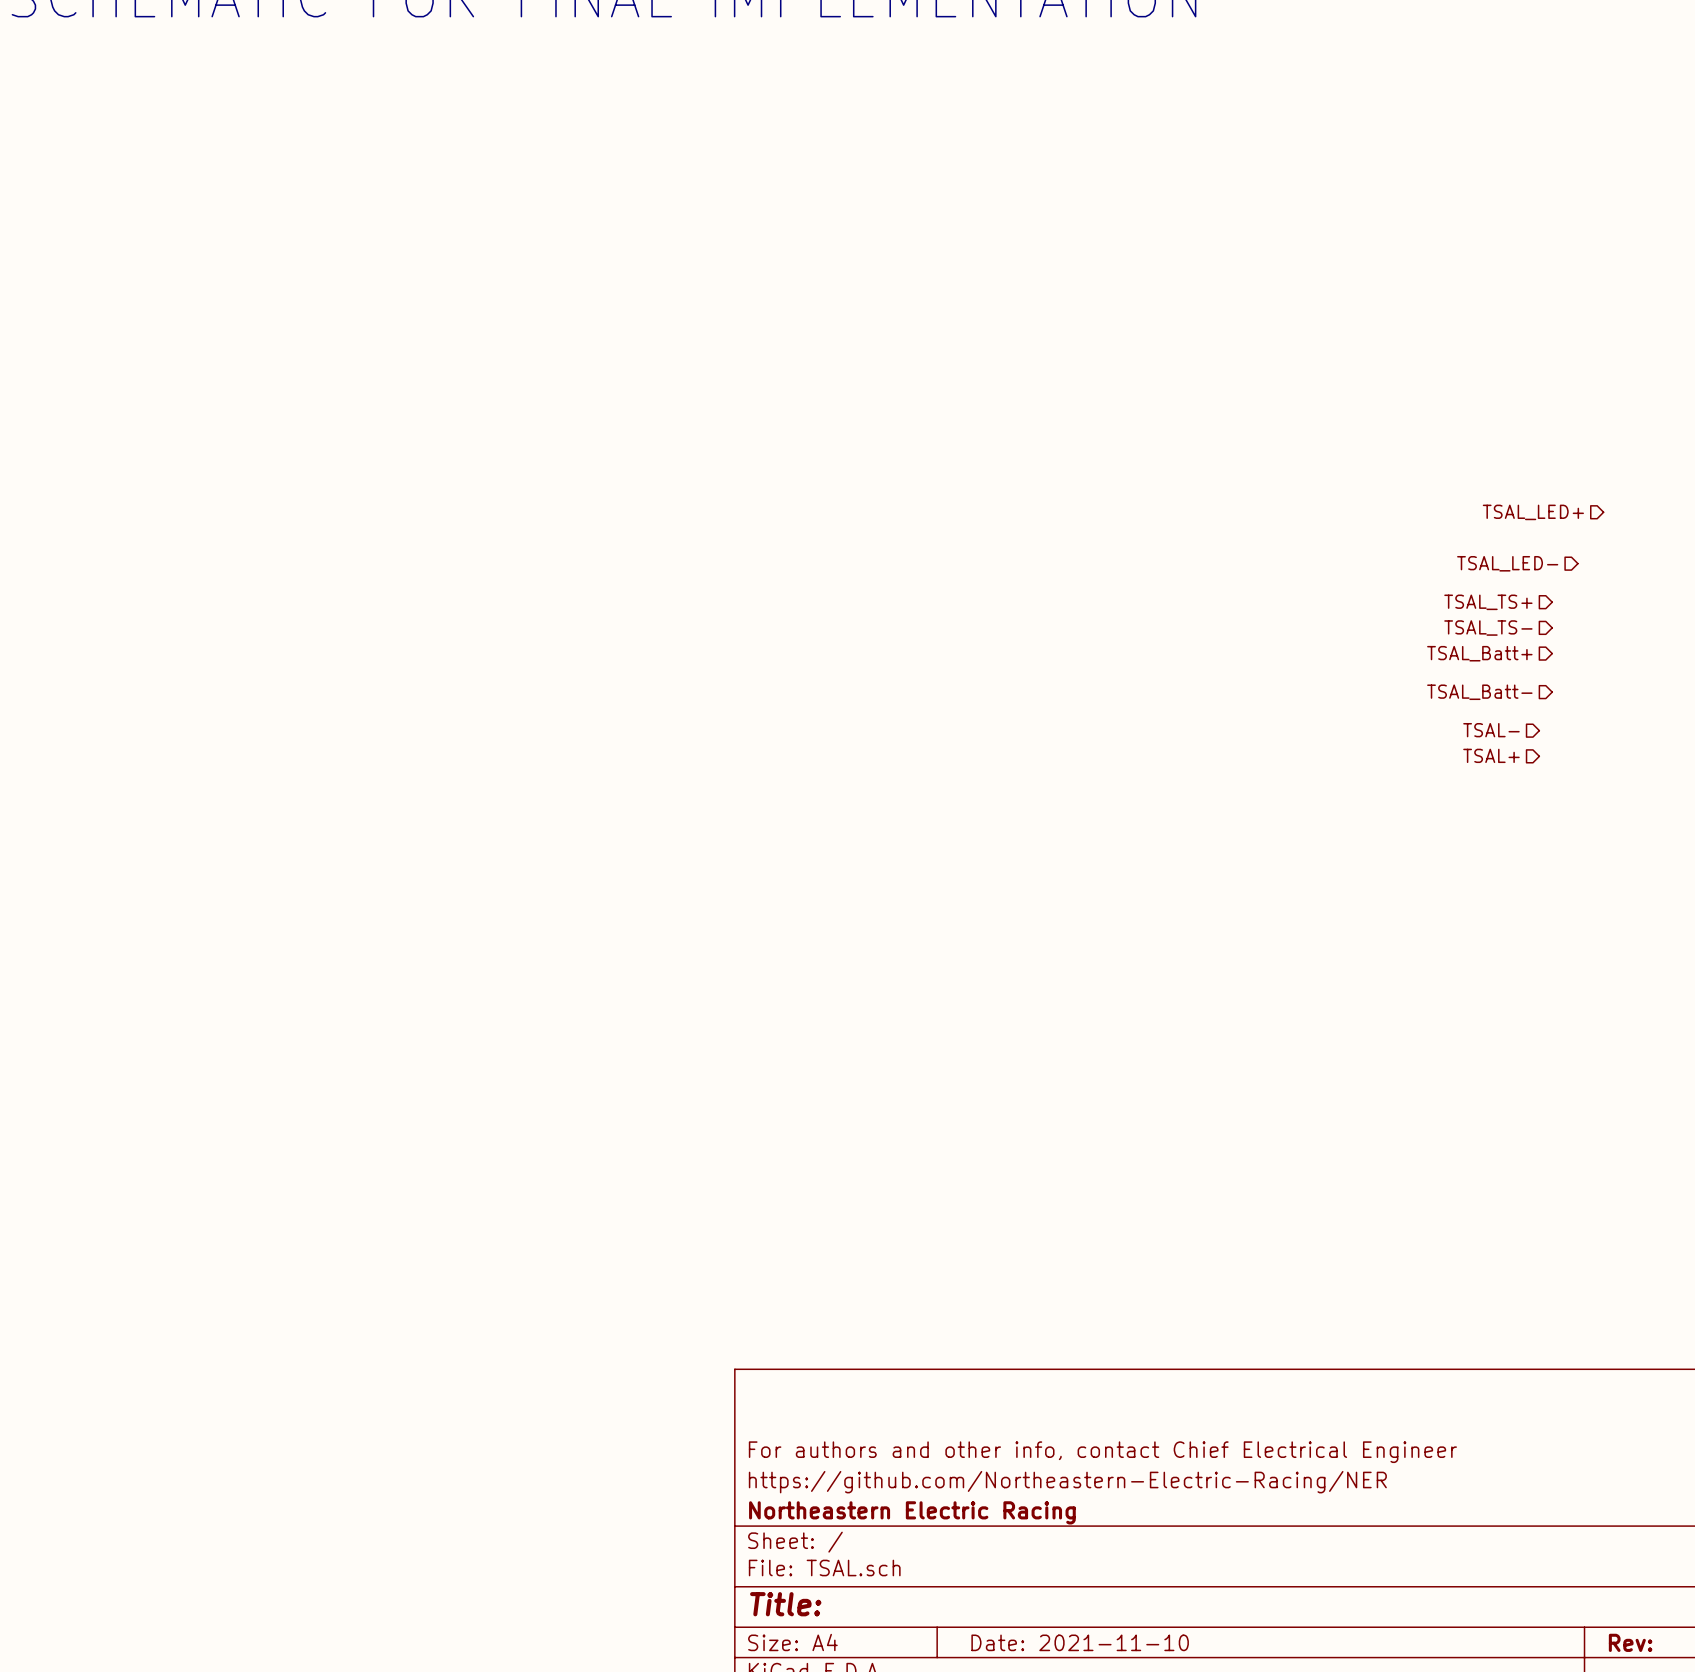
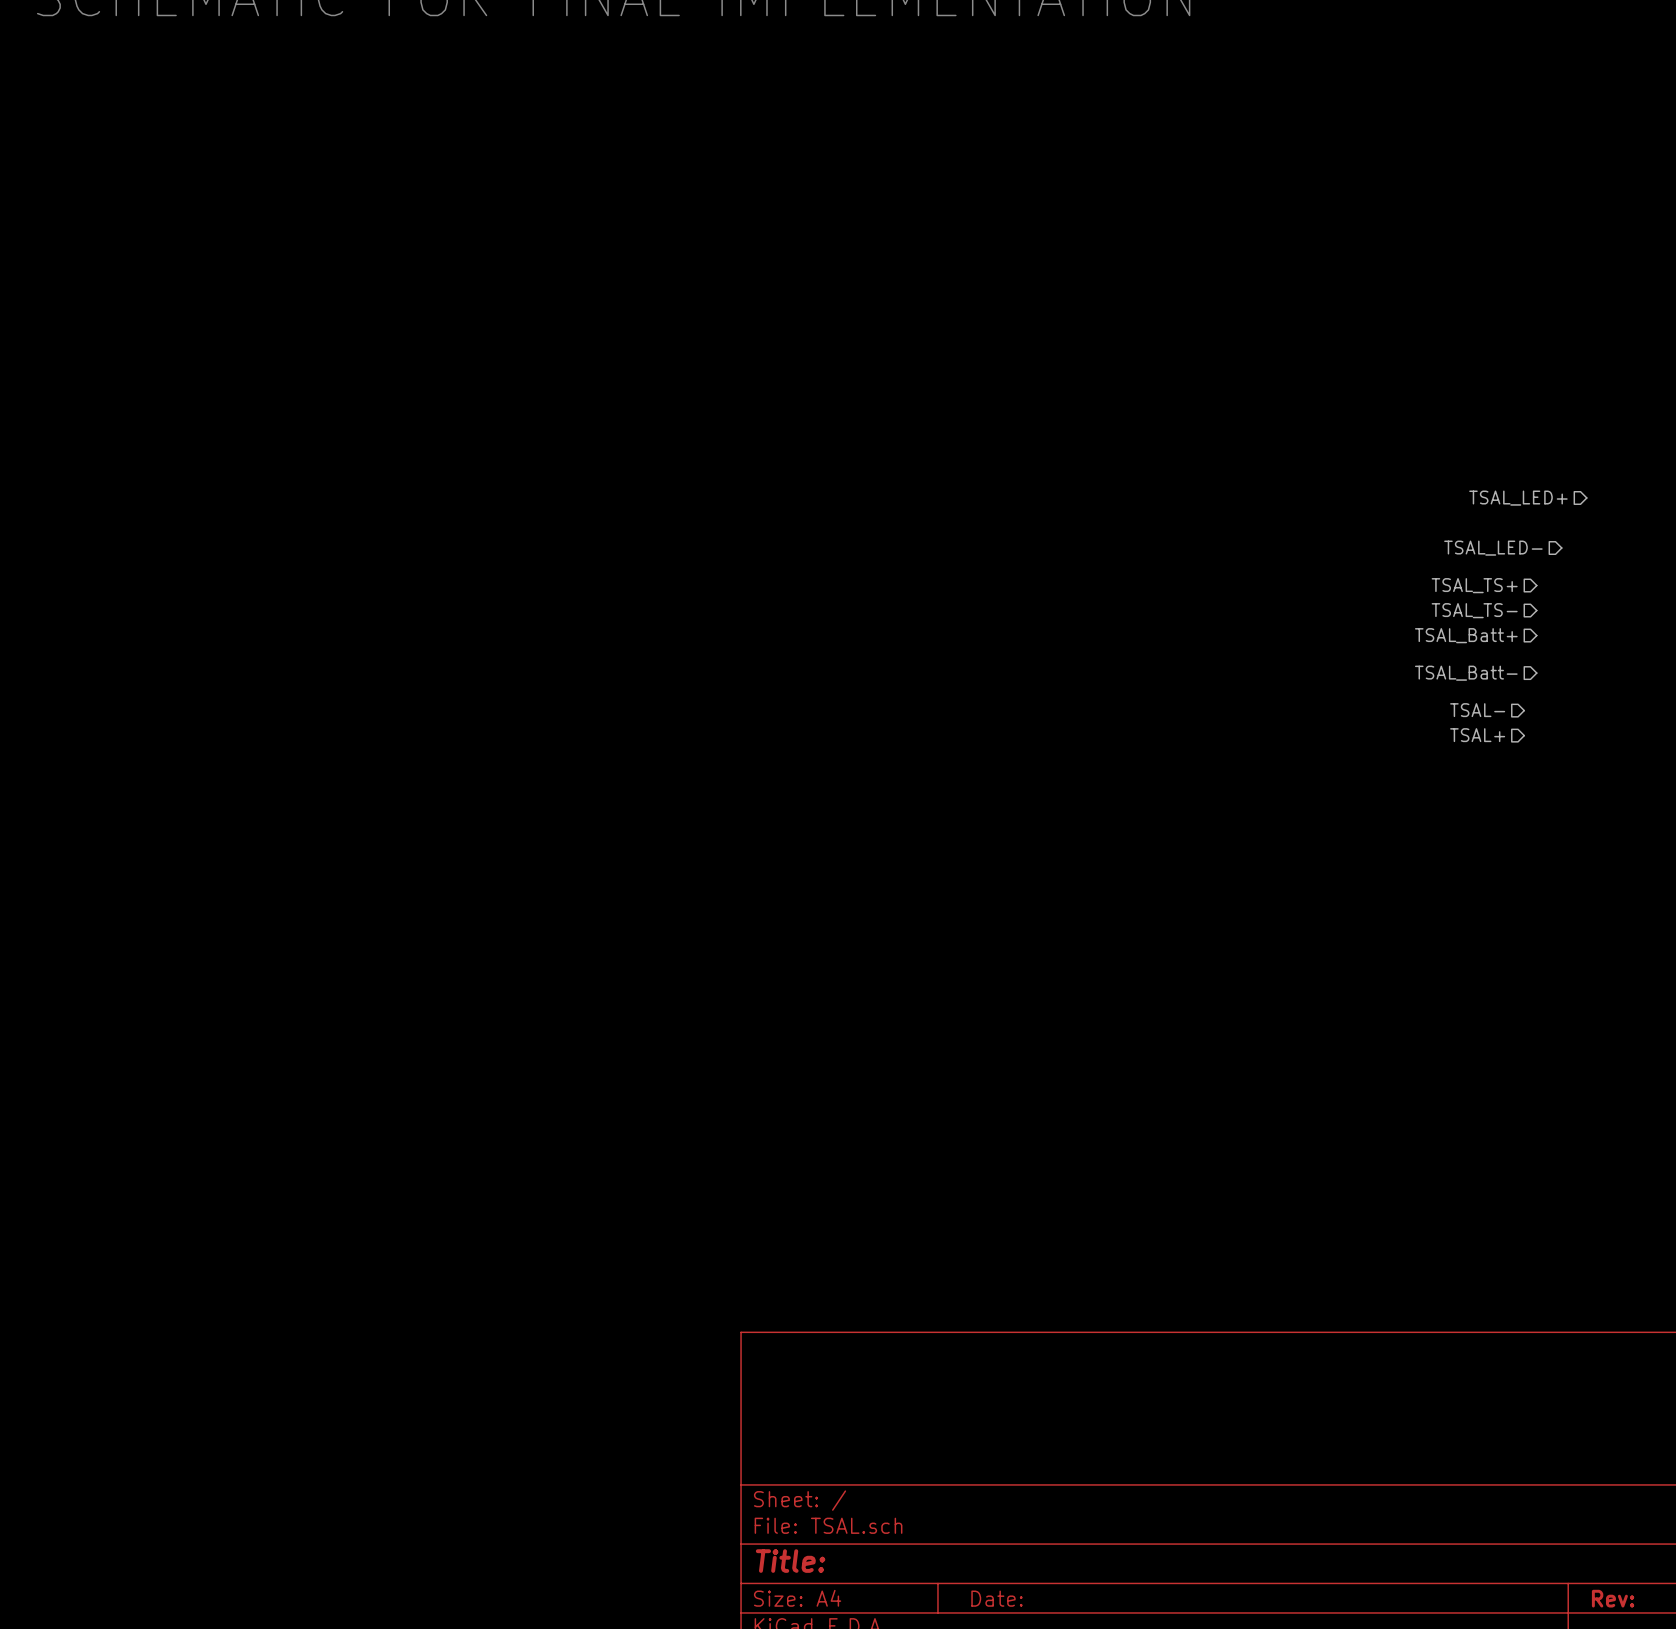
title block: For authors and other info, contact Chief Electrical Engineer (1102, 1452) -> none
title block: https://github.com/Northeastern-Electric-Racing/NER (1067, 1482) -> none
title block: Northeastern Electric Racing (912, 1512) -> none
title block: Date: 2021-11-10 (1080, 1642) -> Date: (997, 1598)

